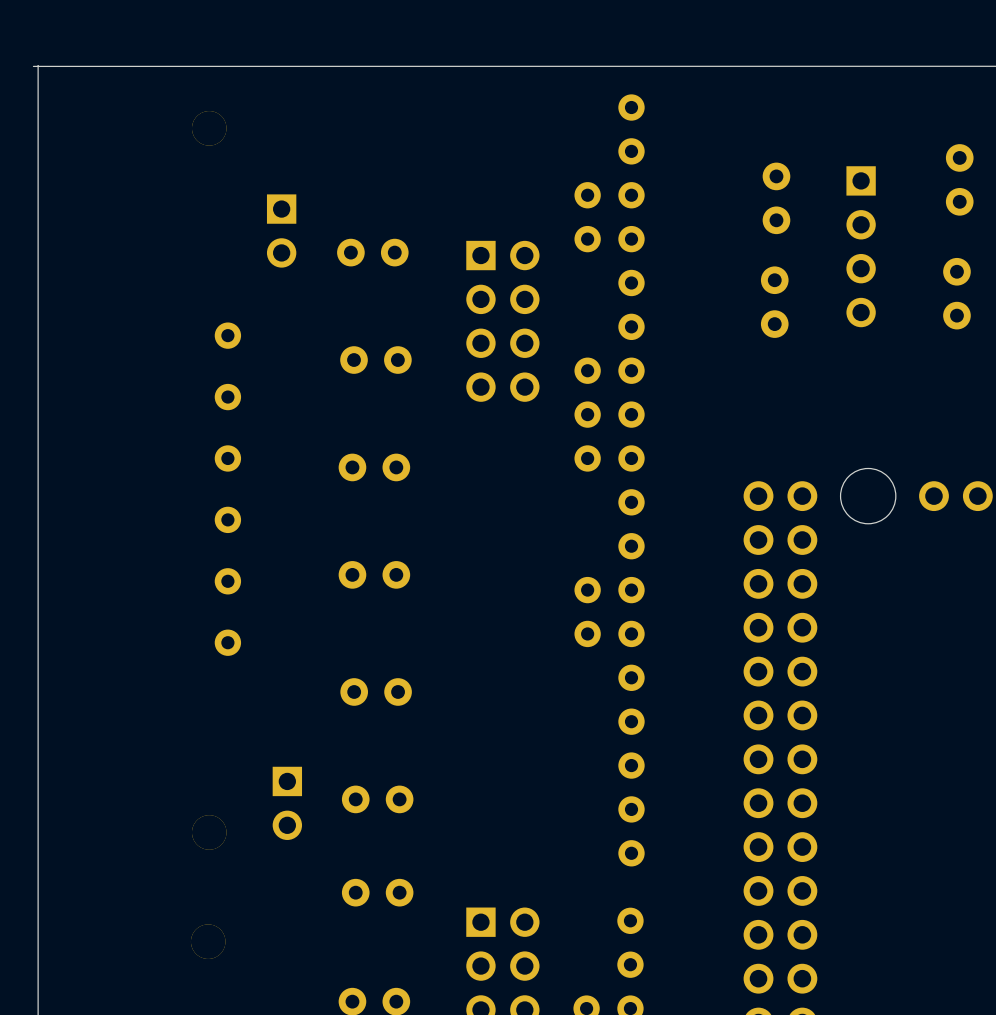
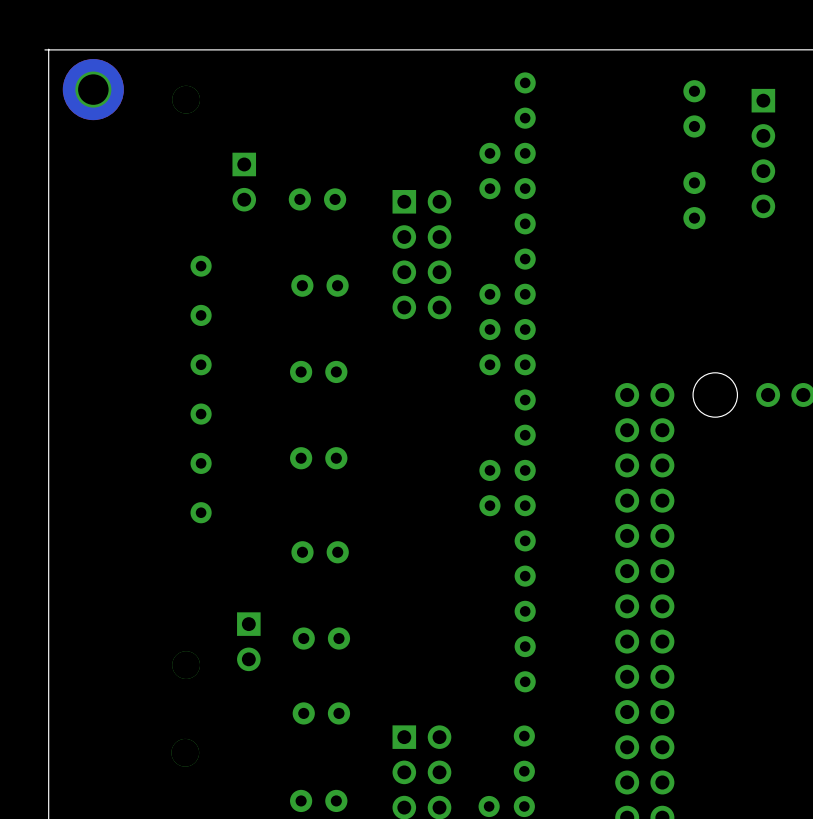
part: none -> (93, 89)
part: none -> (694, 108)
part: (959, 179) -> none
part: (776, 198) -> none
part position: (861, 246) -> (763, 153)
part: none -> (694, 200)
part: (956, 293) -> none
part: (774, 302) -> none

